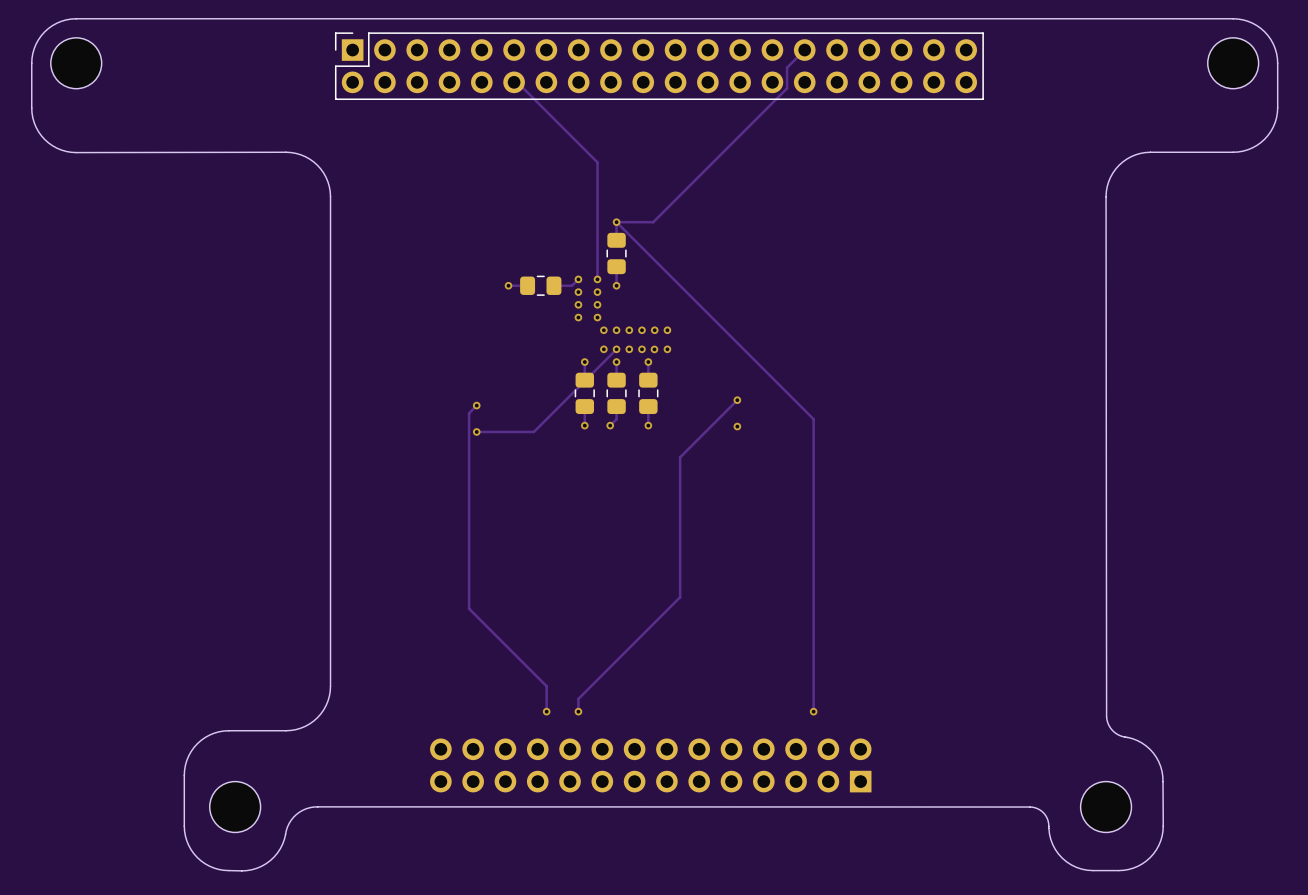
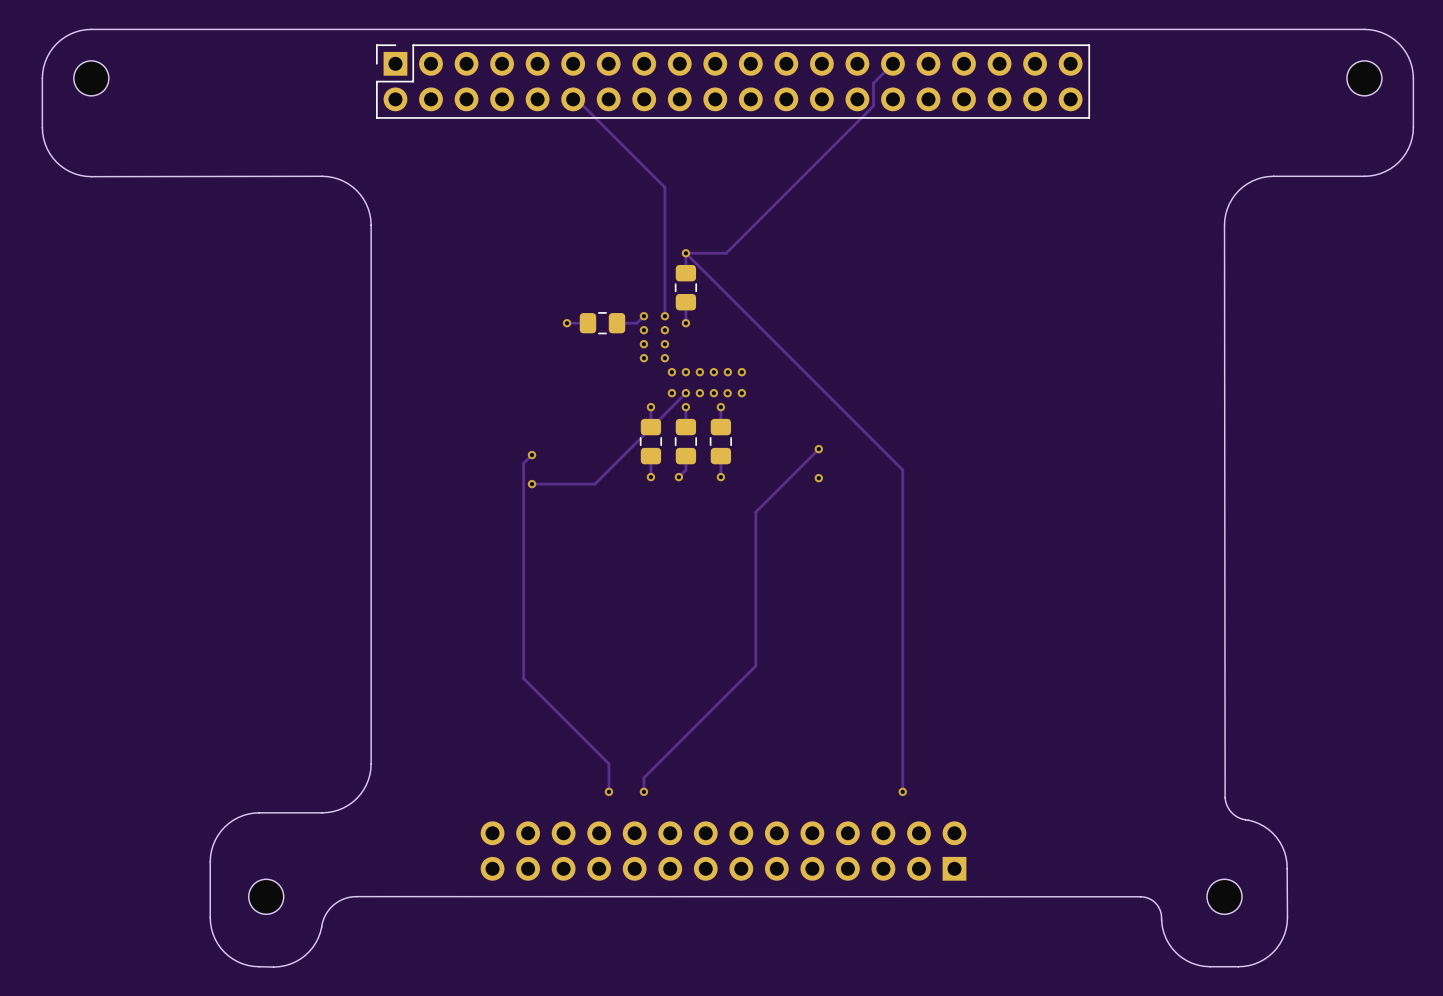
part footprint: [50, 37, 102, 89] -> [73, 60, 109, 96]
part footprint: [1207, 37, 1259, 89] -> [1346, 60, 1382, 96]
part footprint: [209, 781, 261, 833] -> [248, 879, 284, 915]
part footprint: [1080, 781, 1132, 833] -> [1207, 879, 1243, 915]

